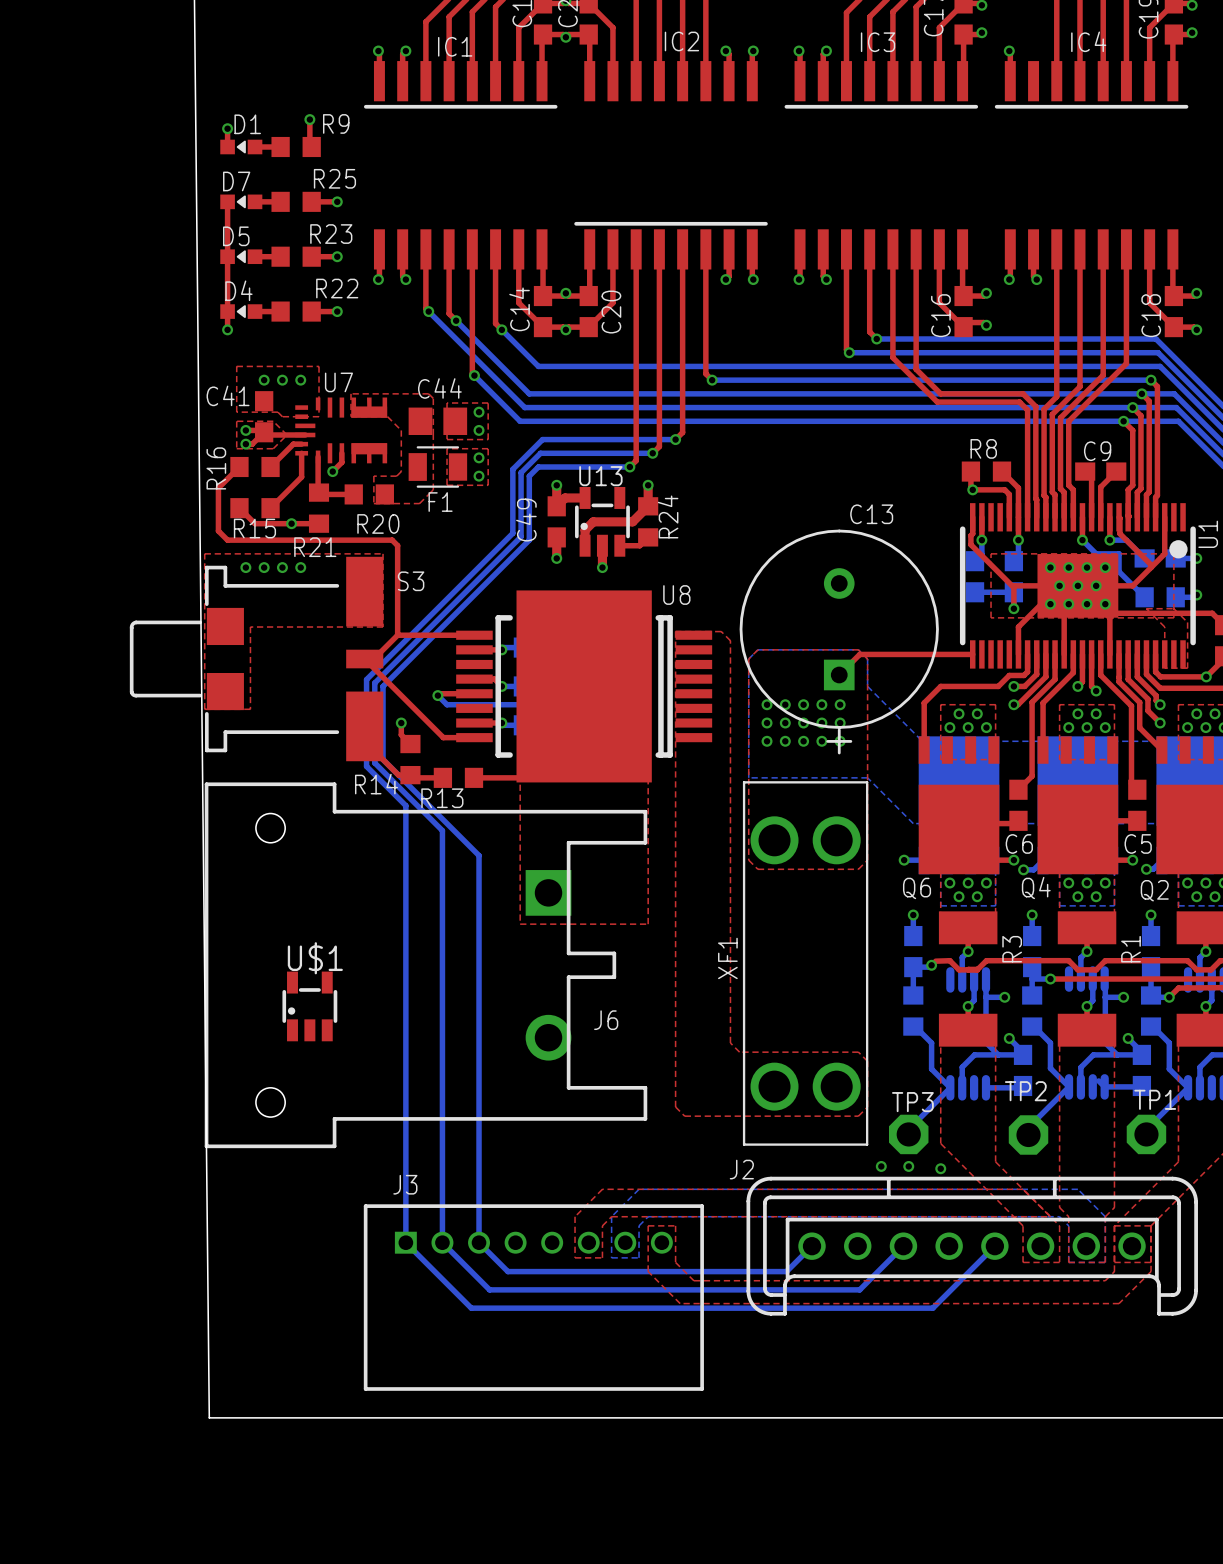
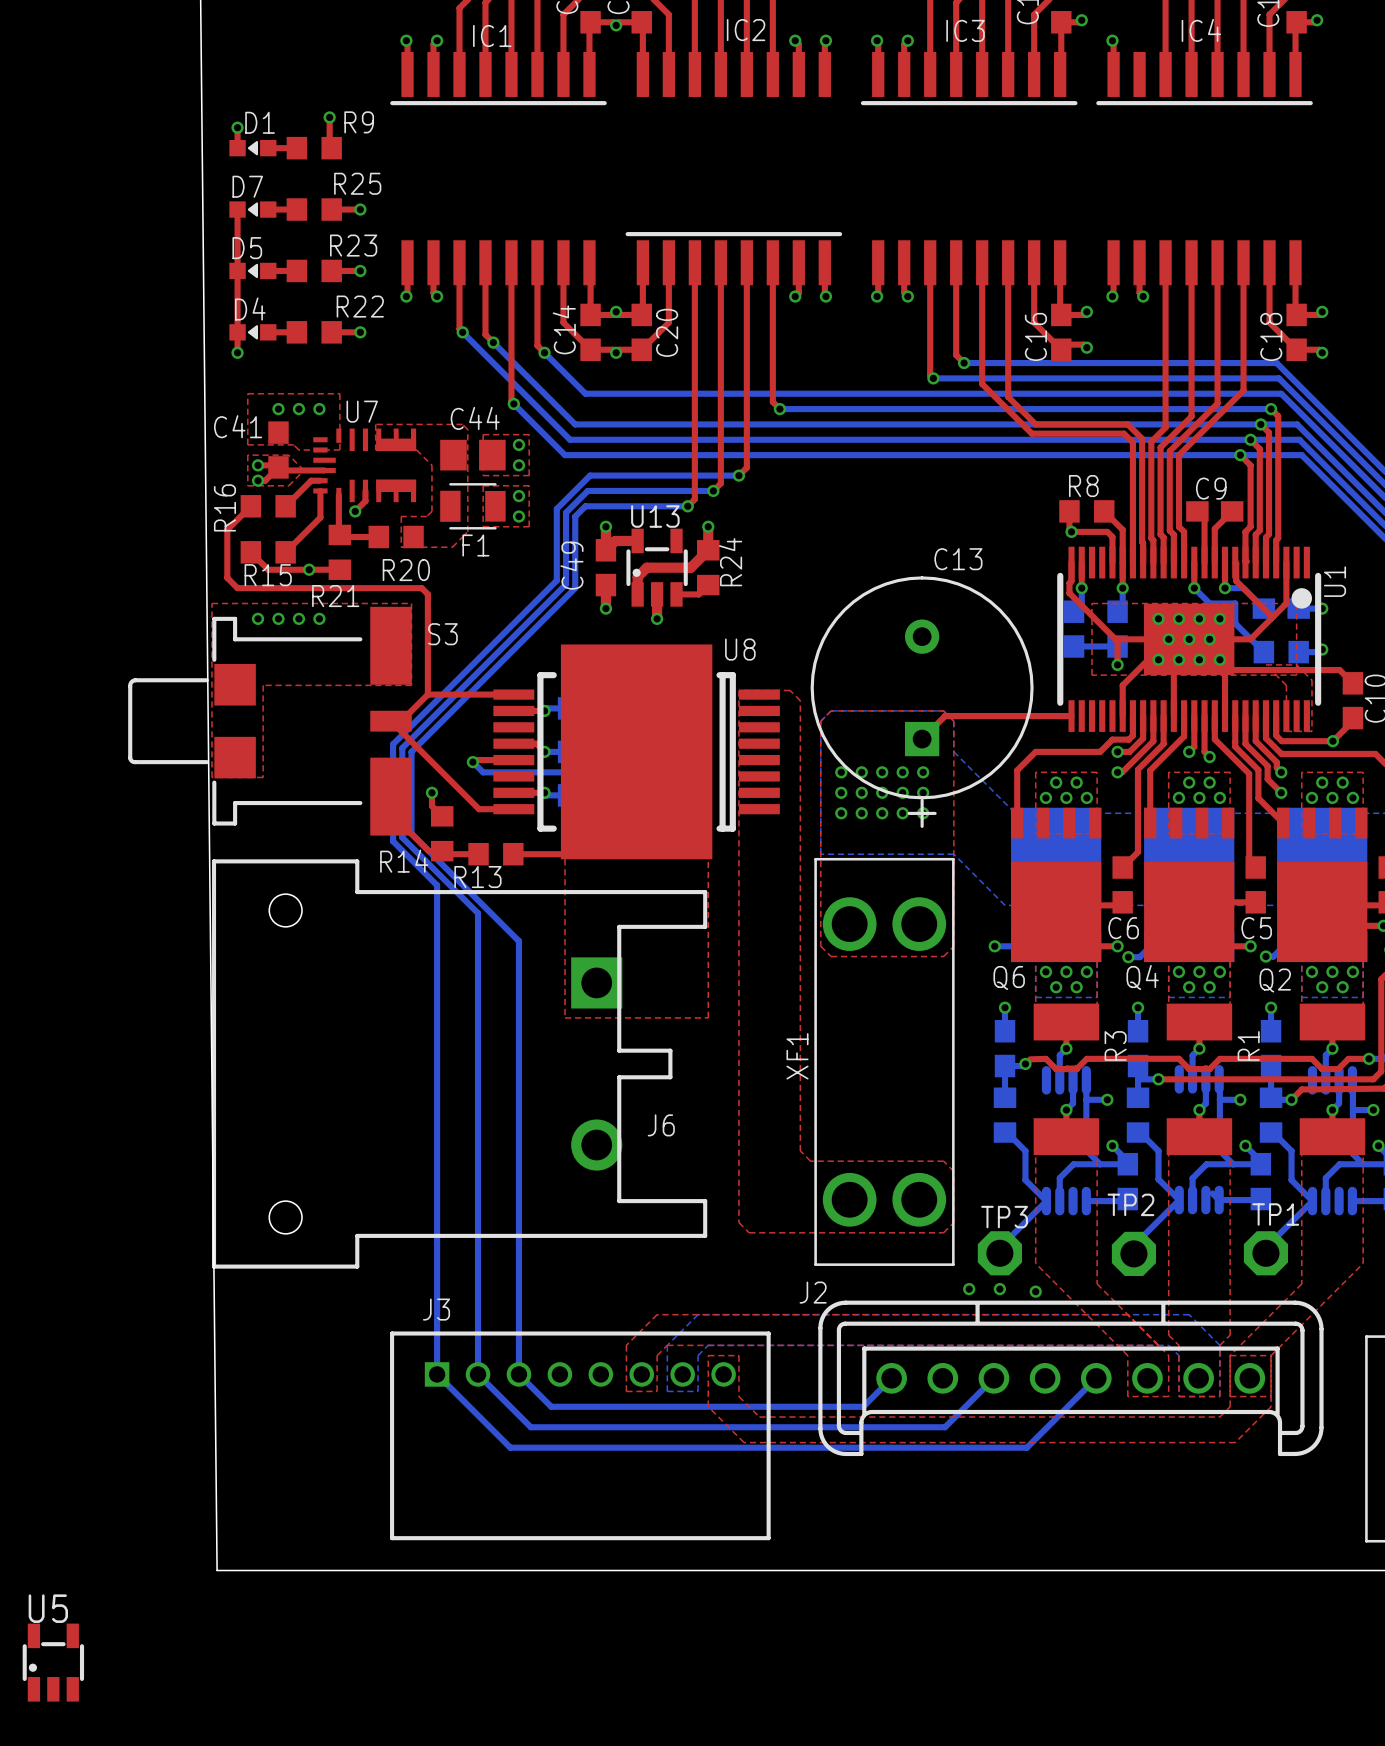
U$1: (309, 1006) -> none
U5: none -> (53, 1662)

